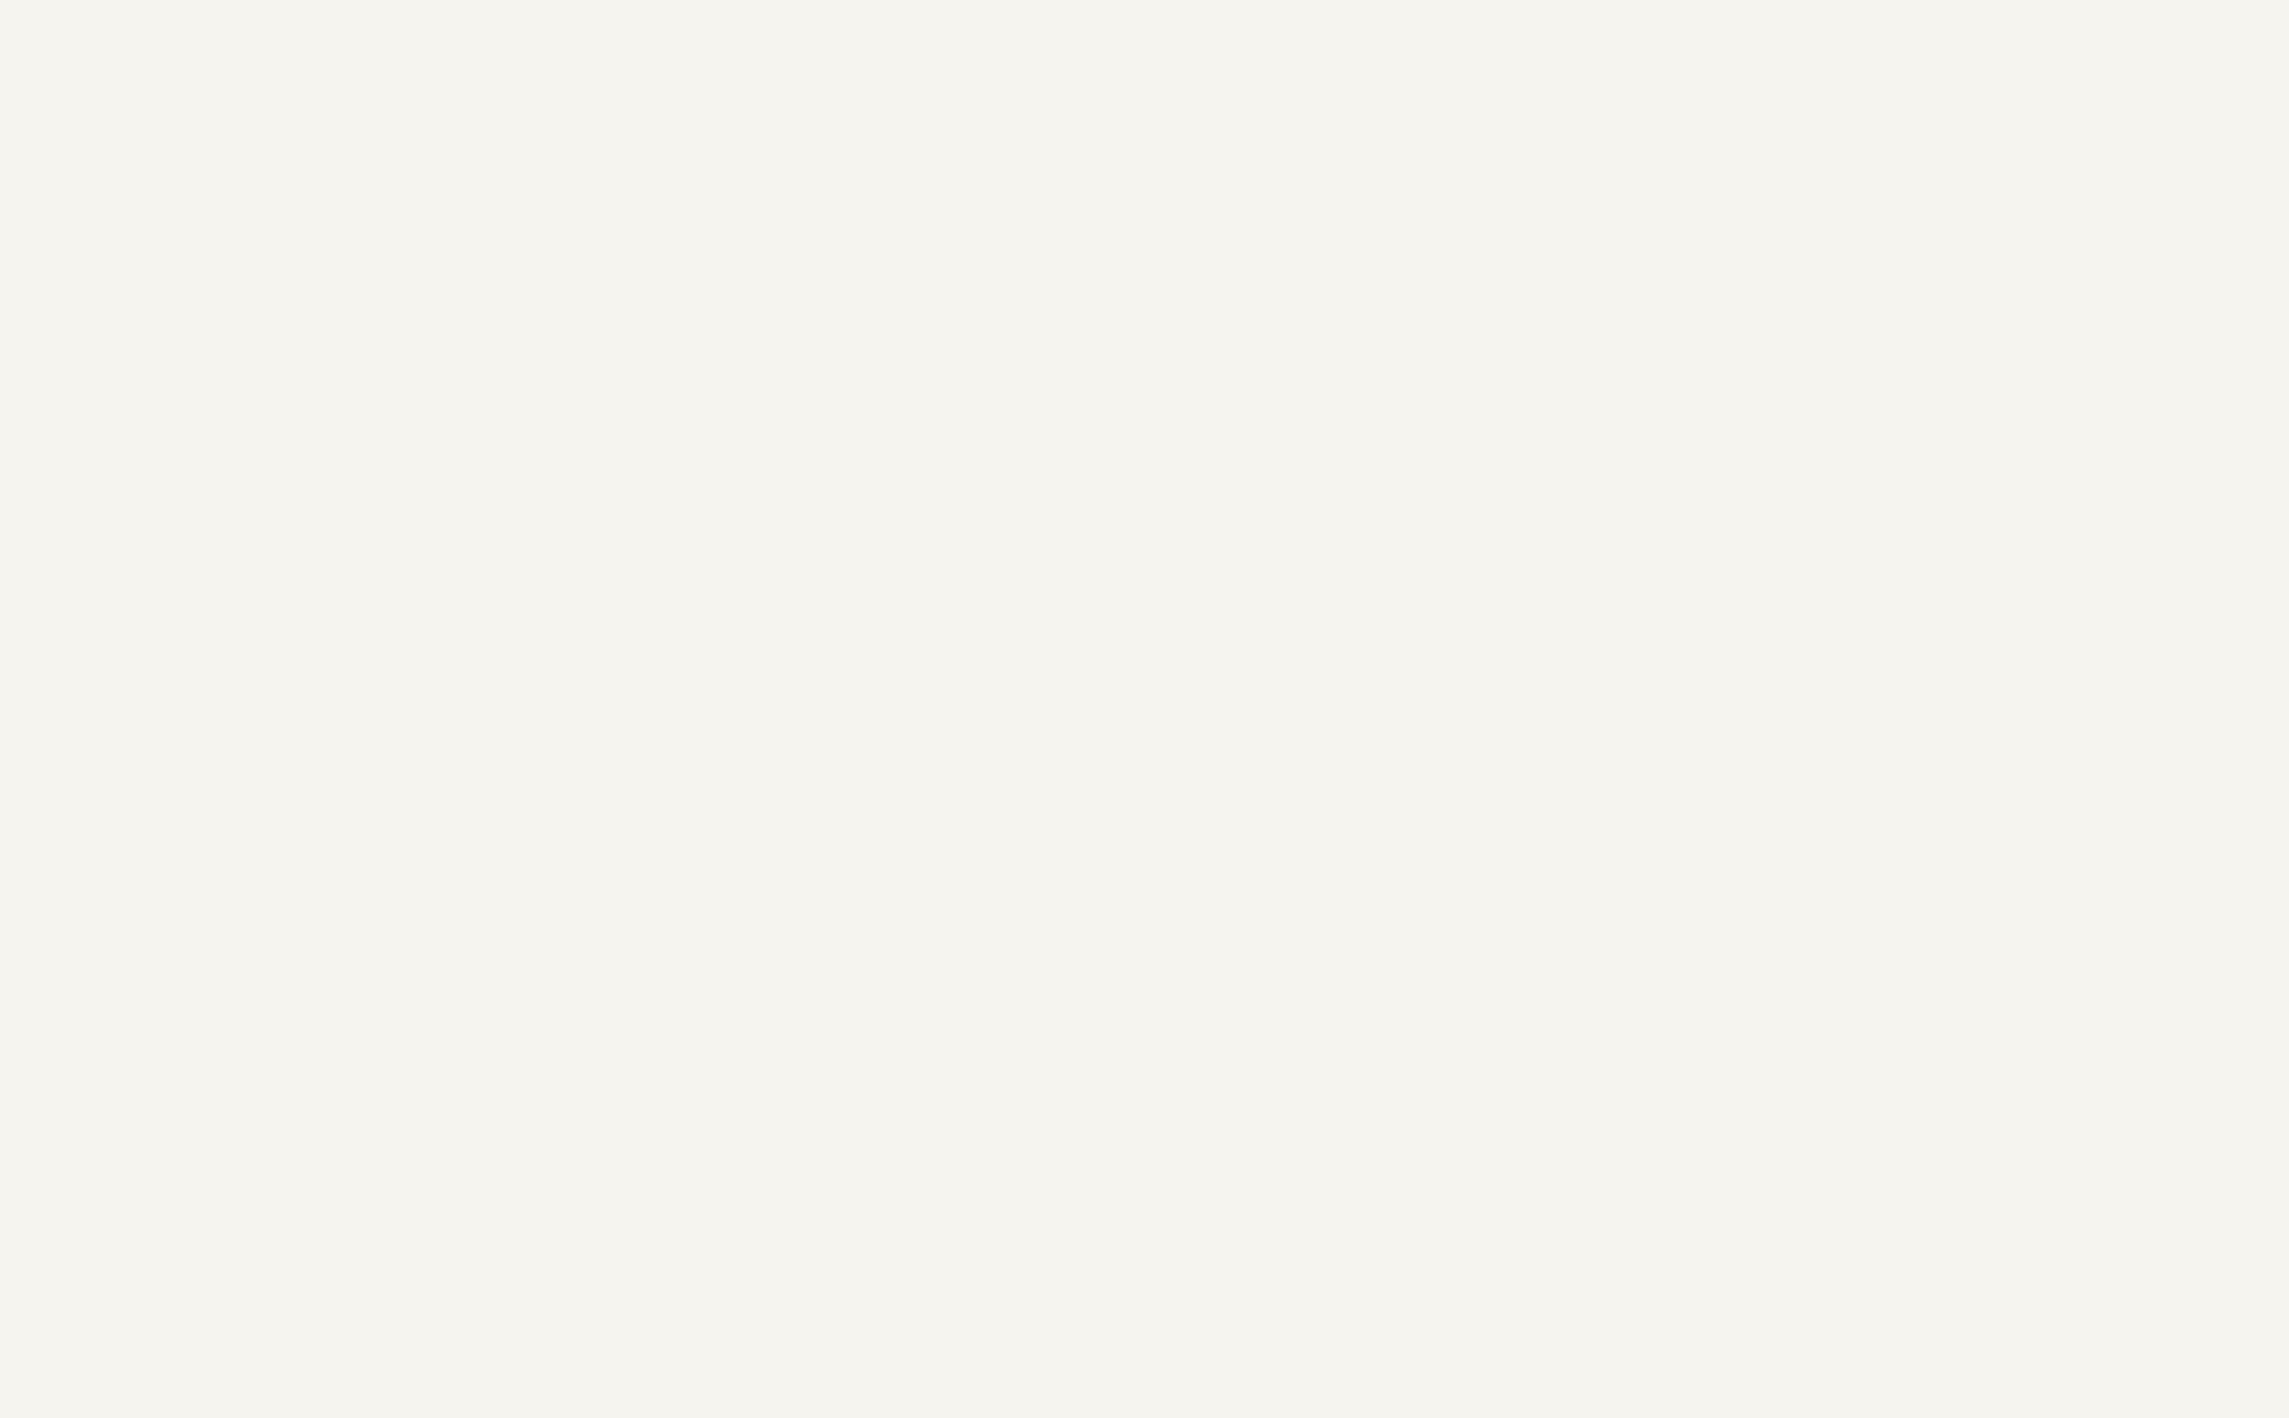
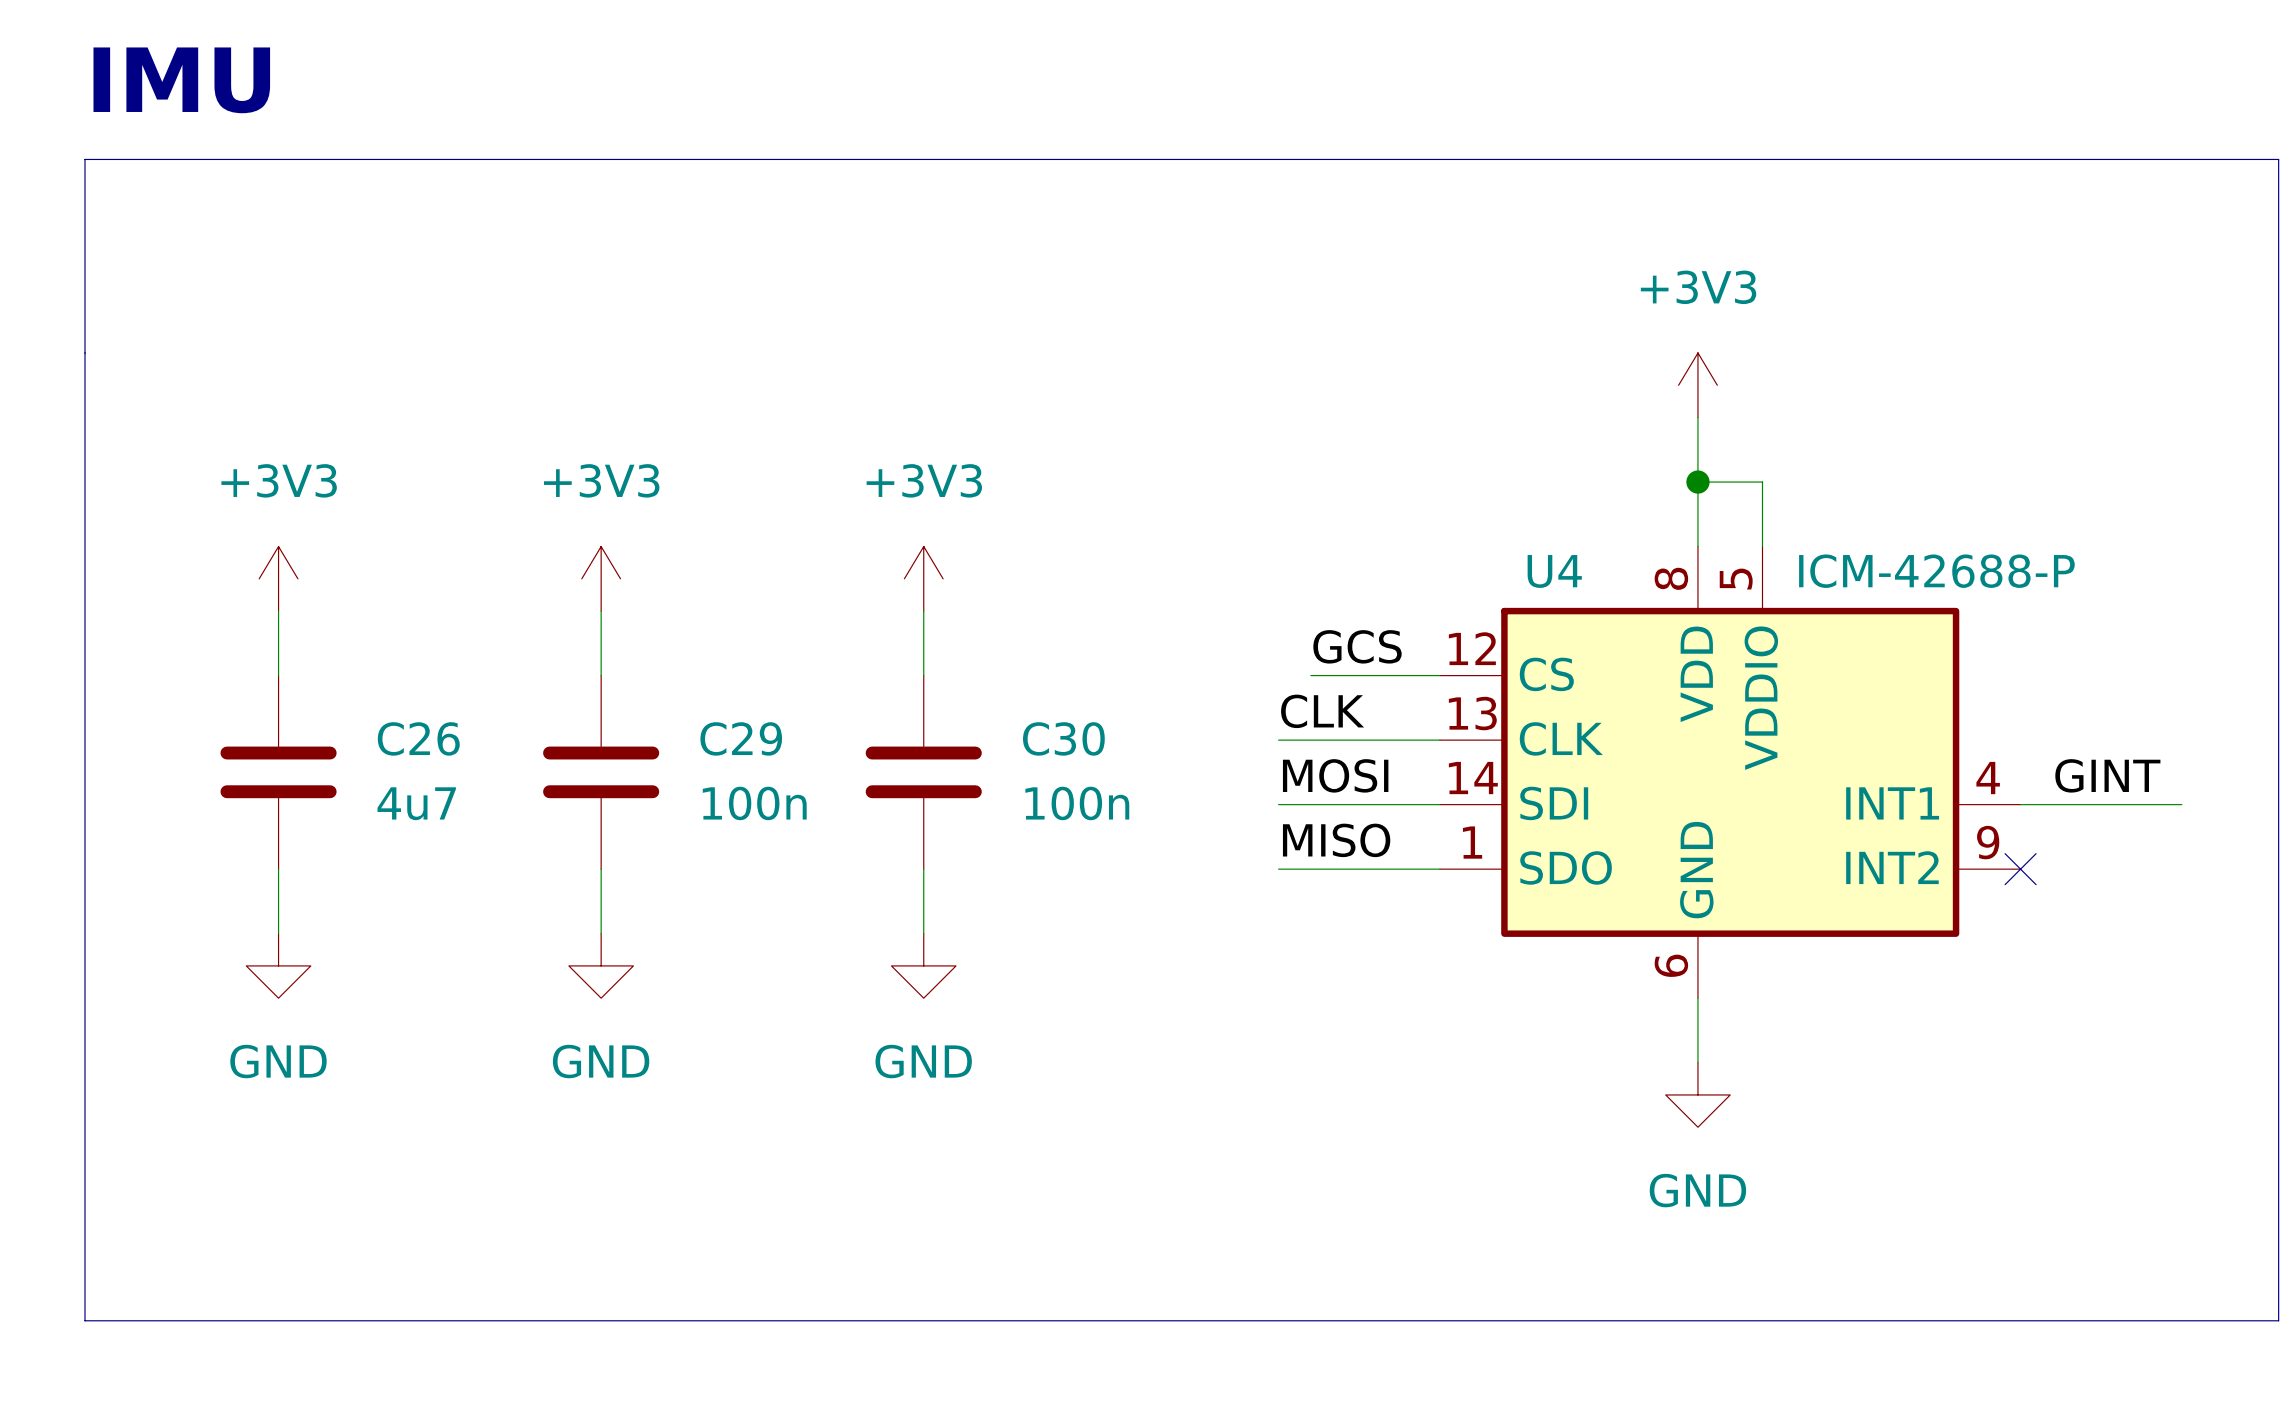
text: none -> IMU (181, 80)
line: none -> (85, 159) (85, 1320) (2278, 1320) (2278, 159) (85, 159)
power symbol: none -> +3V3 (1697, 385)
wire: none -> (1697, 417) (1697, 546)
wire: none -> (1697, 482) (1762, 482) (1762, 546)
junction: none -> (1697, 482)
power symbol: none -> +3V3 (278, 578)
power symbol: none -> +3V3 (601, 578)
power symbol: none -> +3V3 (923, 578)
wire: none -> (278, 611) (278, 675)
wire: none -> (601, 611) (601, 675)
wire: none -> (923, 611) (923, 675)
label: none -> GCS (1357, 646)
wire: none -> (1310, 675) (1439, 675)
label: none -> CLK (1322, 711)
wire: none -> (1278, 740) (1439, 740)
C26: none -> 4u7 (278, 772)
C29: none -> 100n (601, 772)
C30: none -> 100n (923, 772)
U4: none -> ICM-42688-P (1730, 772)
label: none -> MOSI (1335, 775)
label: none -> GINT (2107, 775)
wire: none -> (1278, 804) (1439, 804)
wire: none -> (2020, 804) (2181, 804)
label: none -> MISO (1336, 840)
wire: none -> (278, 869) (278, 933)
wire: none -> (601, 869) (601, 933)
wire: none -> (923, 869) (923, 933)
wire: none -> (1278, 869) (1439, 869)
no-connect mark: none -> (2020, 869)
power symbol: none -> GND (278, 965)
power symbol: none -> GND (601, 965)
power symbol: none -> GND (923, 965)
wire: none -> (1697, 998) (1697, 1062)
power symbol: none -> GND (1697, 1094)

